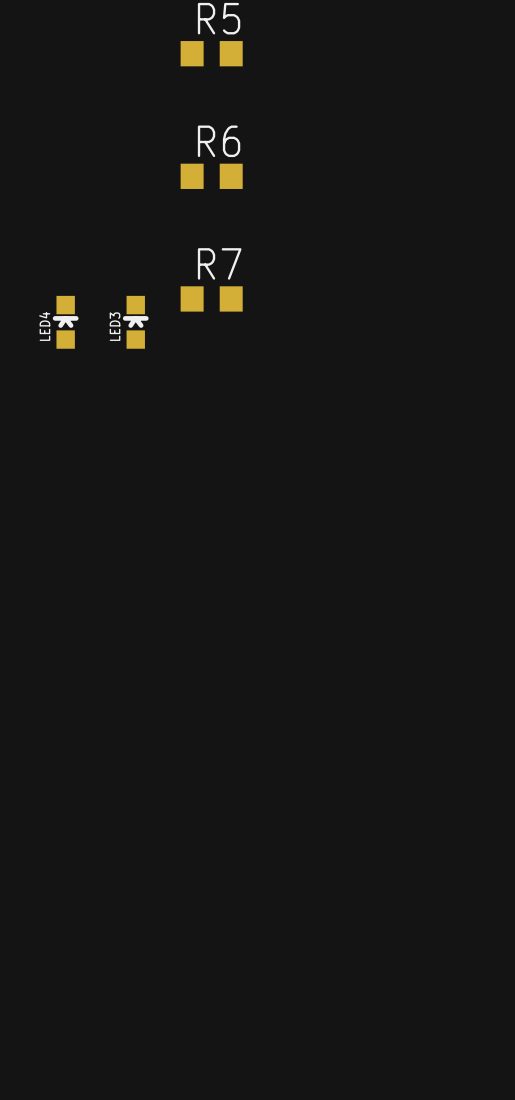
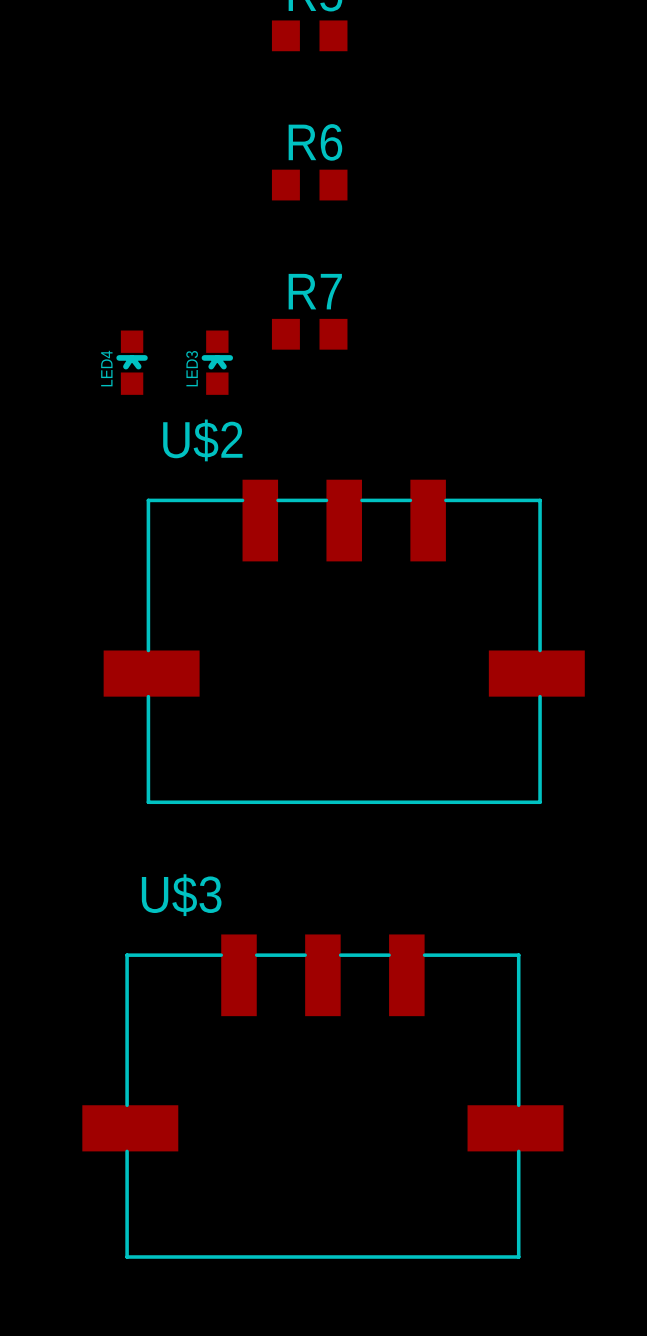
U$2: none -> (344, 641)
U$3: none -> (322, 1096)

